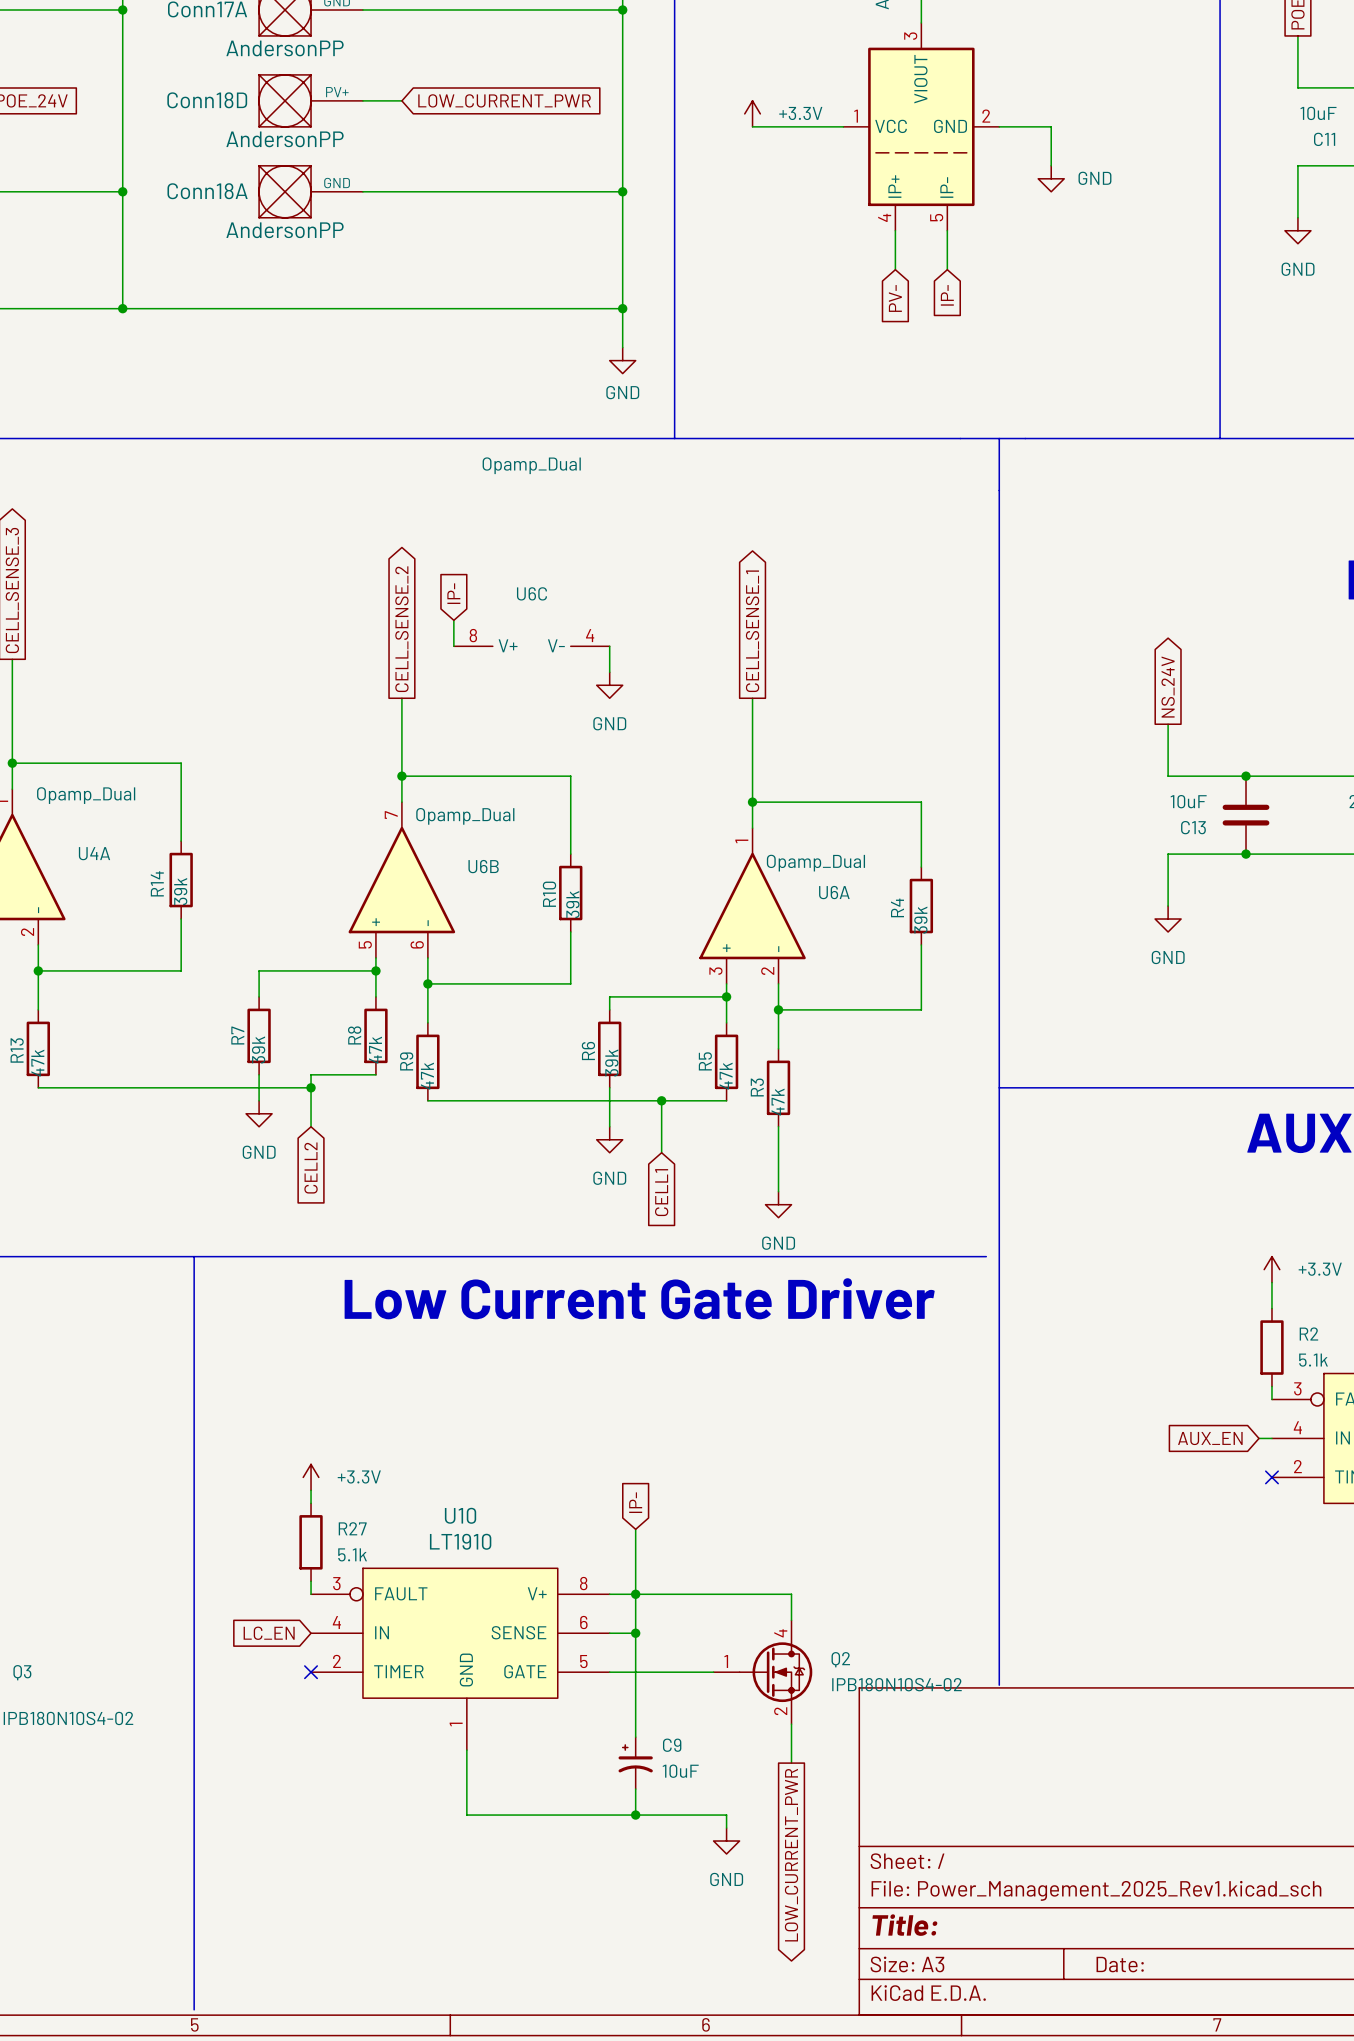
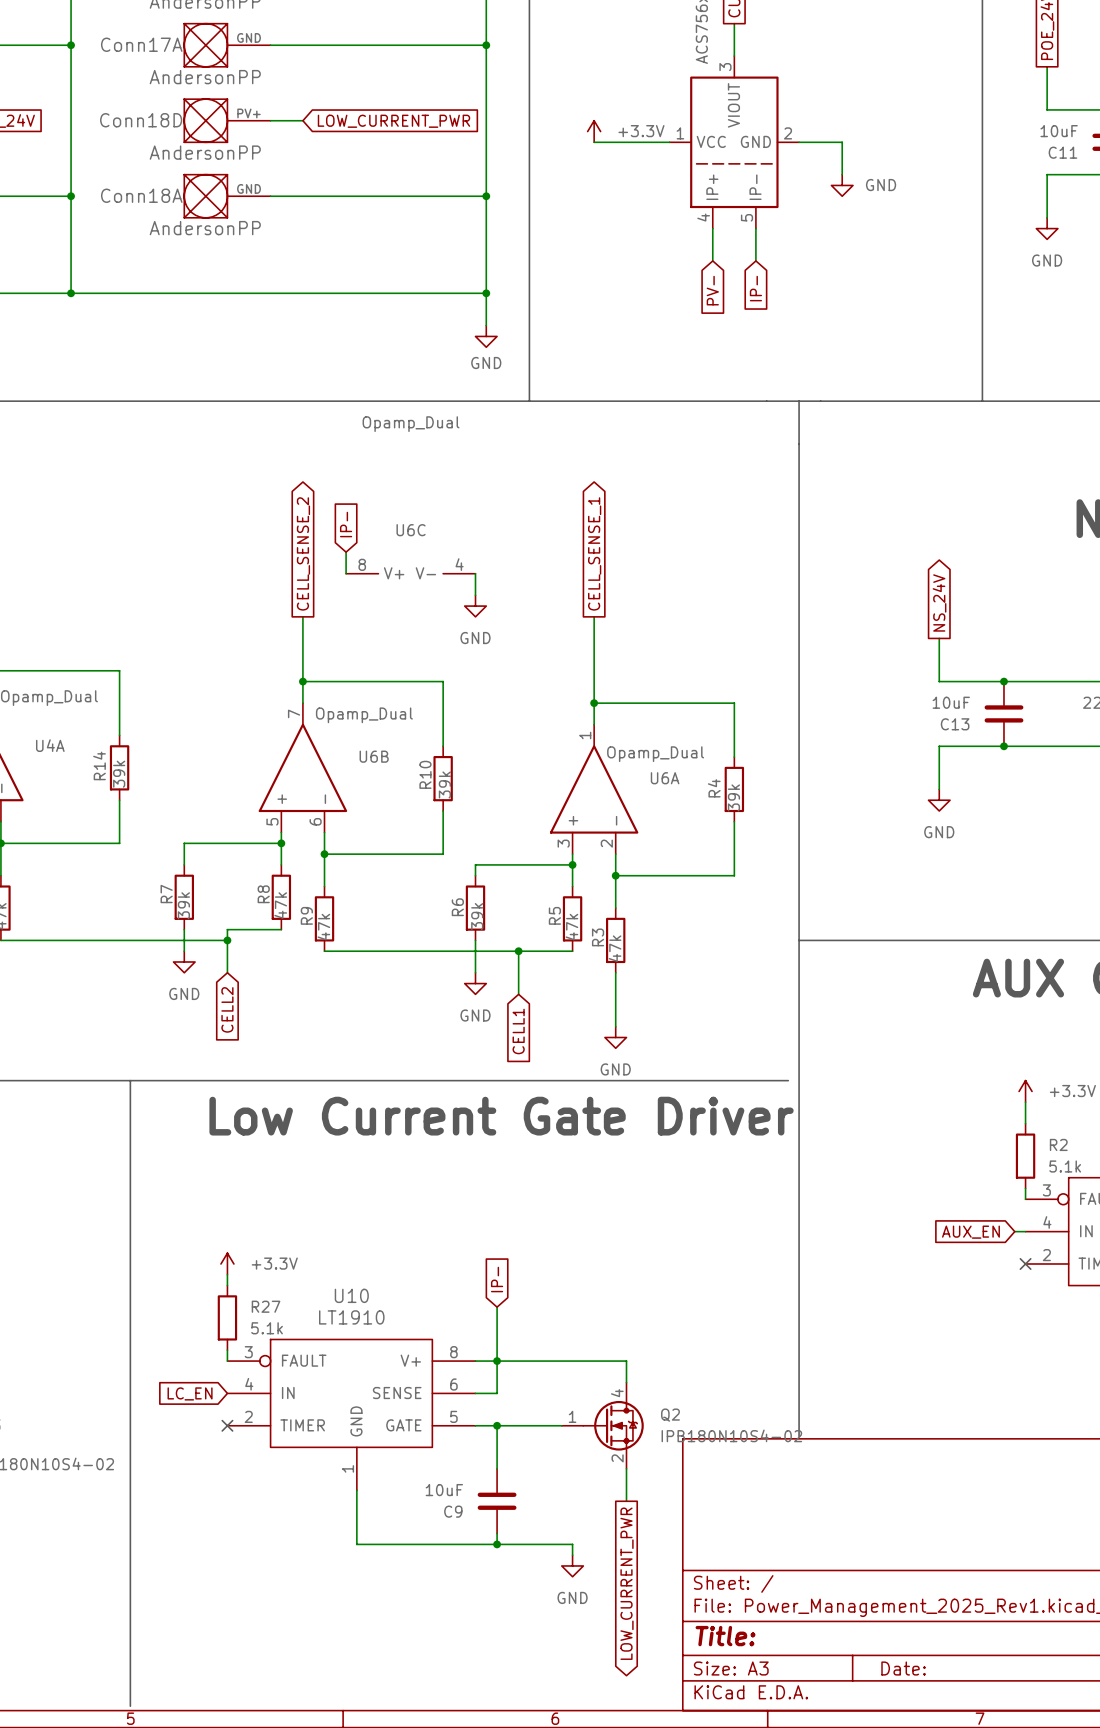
wire: (635, 1633) (635, 1672) -> none
junction position: (635, 1633) -> (497, 1425)
C9 symbol: [618, 1737, 653, 1790] -> [477, 1468, 517, 1534]
C9 name position: C9 (672, 1745) -> C9 (453, 1511)
C9 value position: 10uF (680, 1771) -> 10uF (444, 1490)

